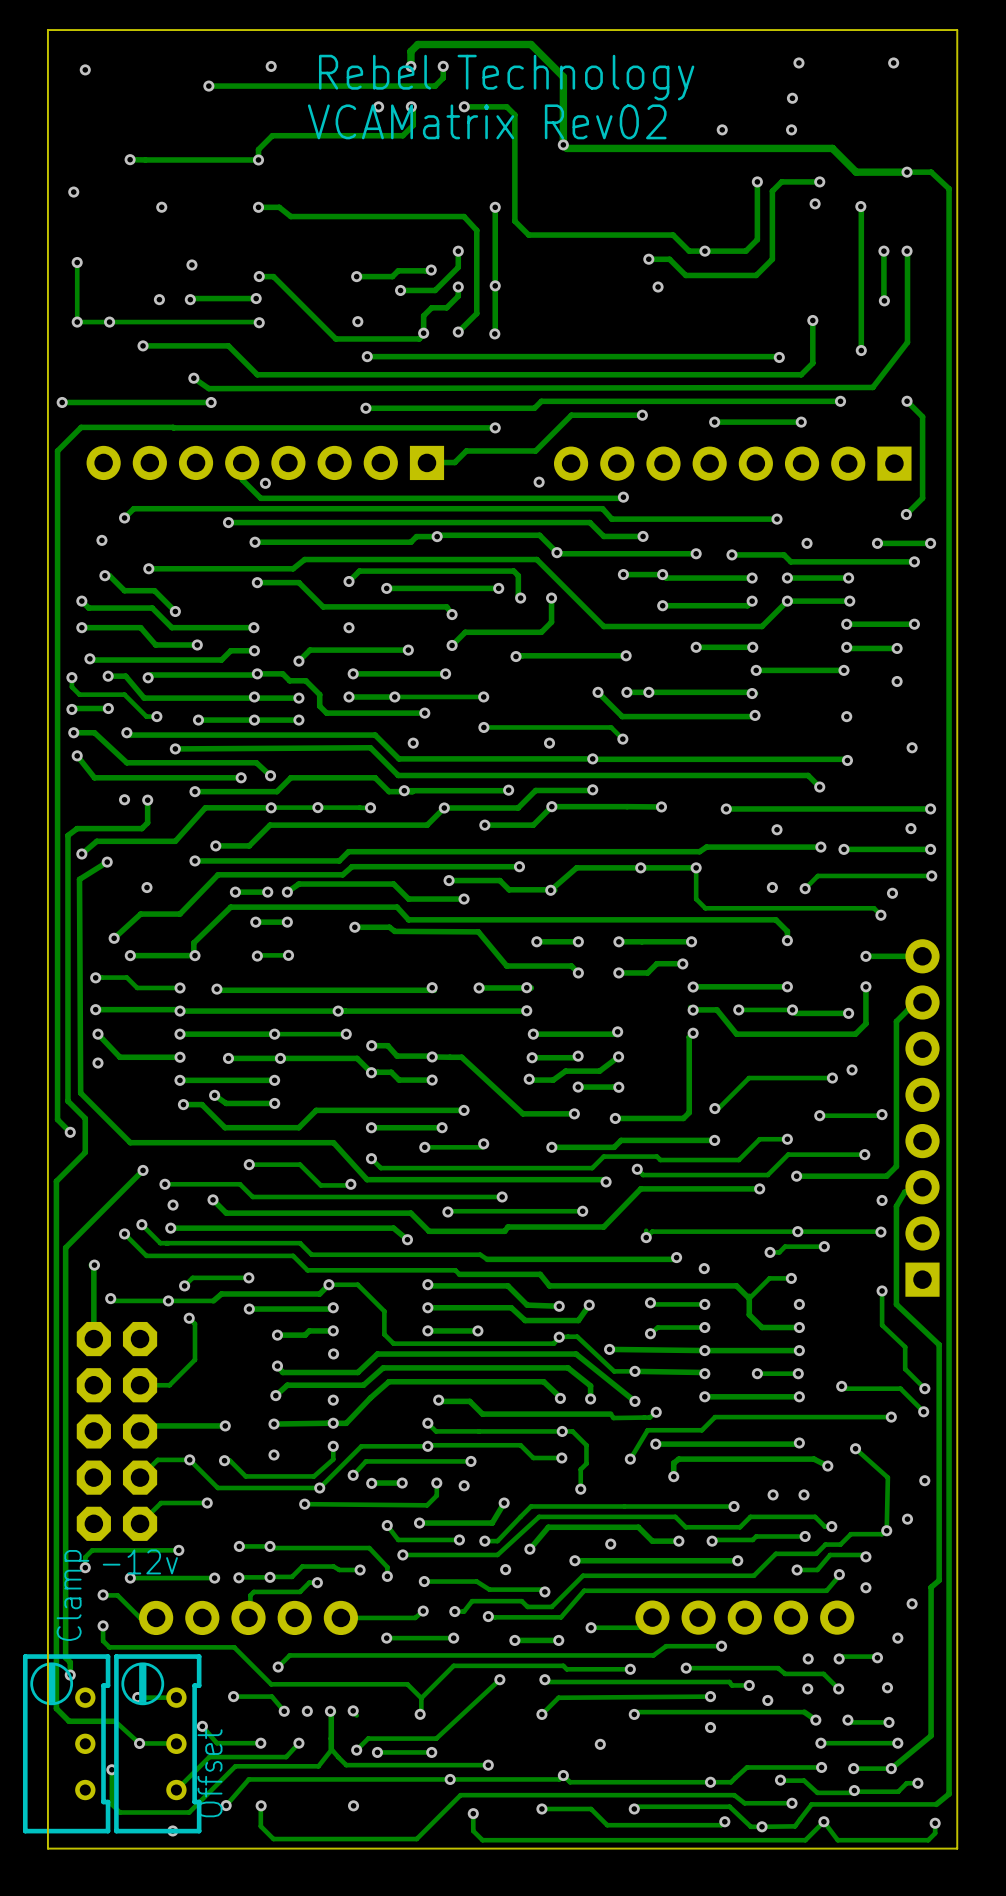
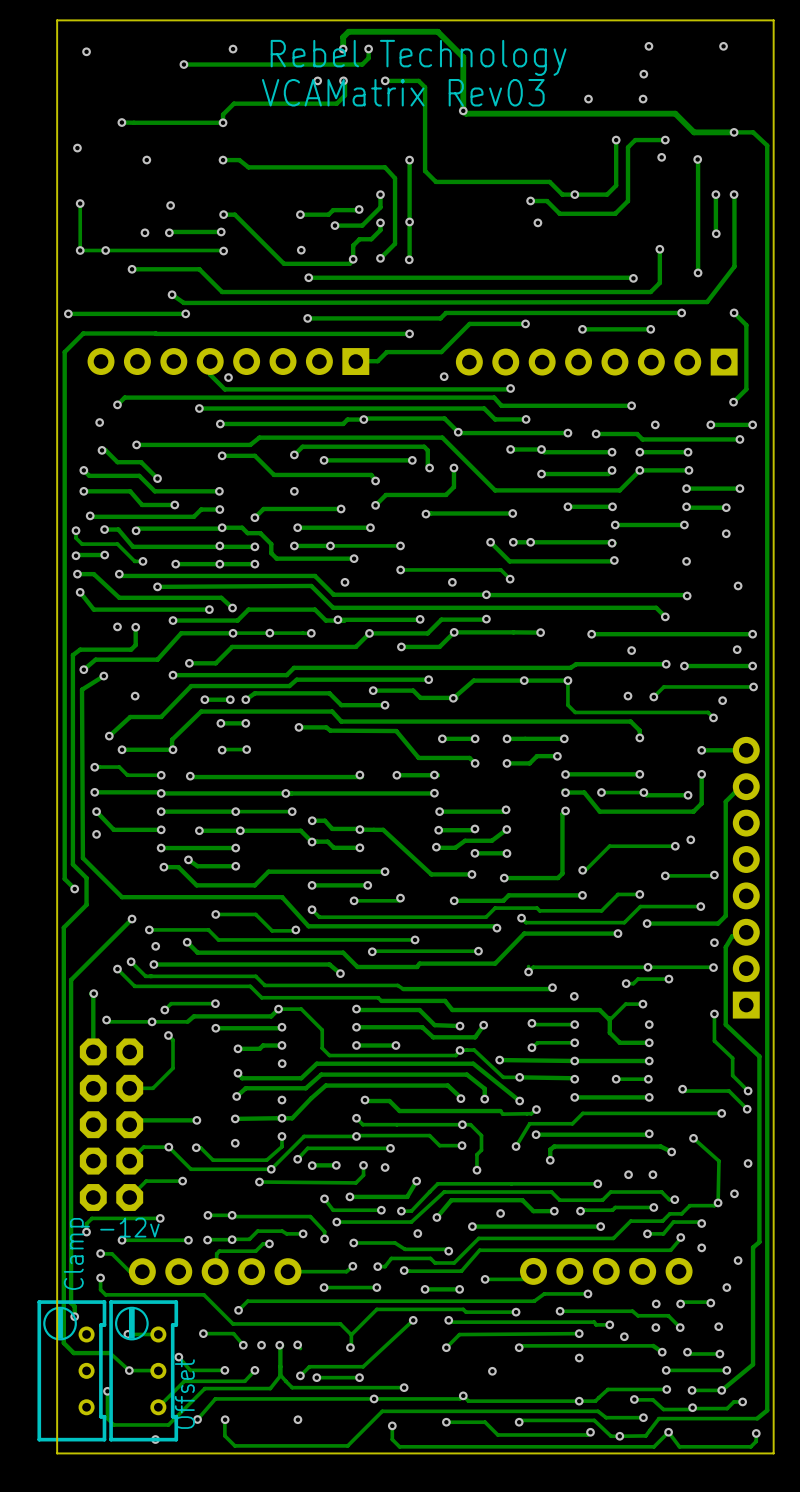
text: VCAMatrix Rev02 (487, 121) -> VCAMatrix Rev03 (403, 92)

